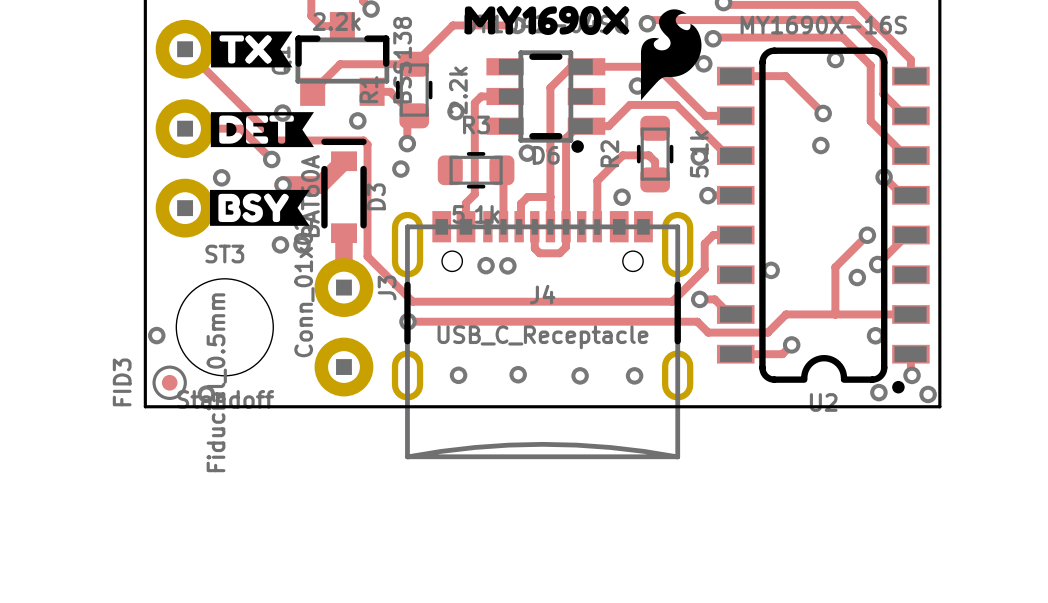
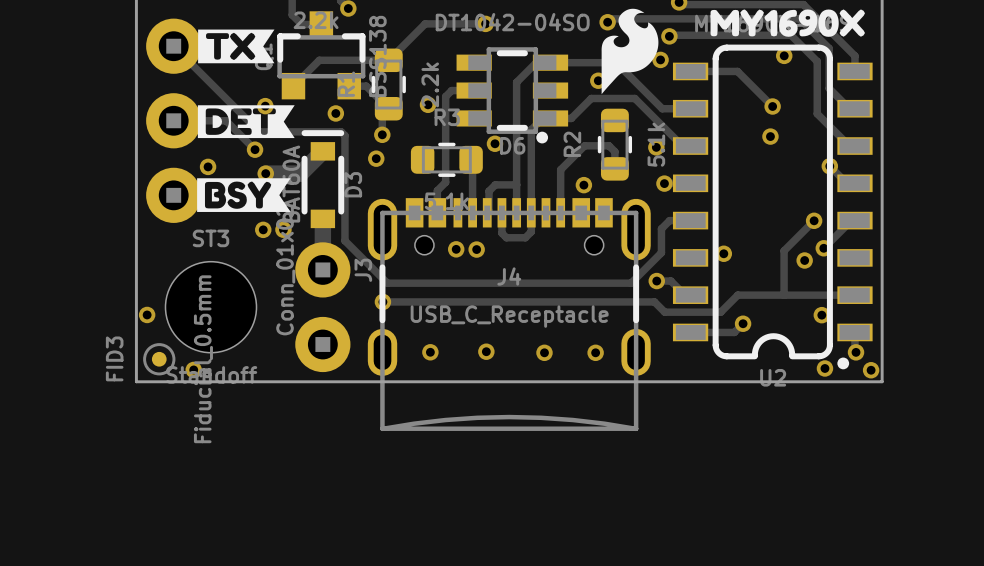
drawing position: (547, 20) -> (787, 23)

